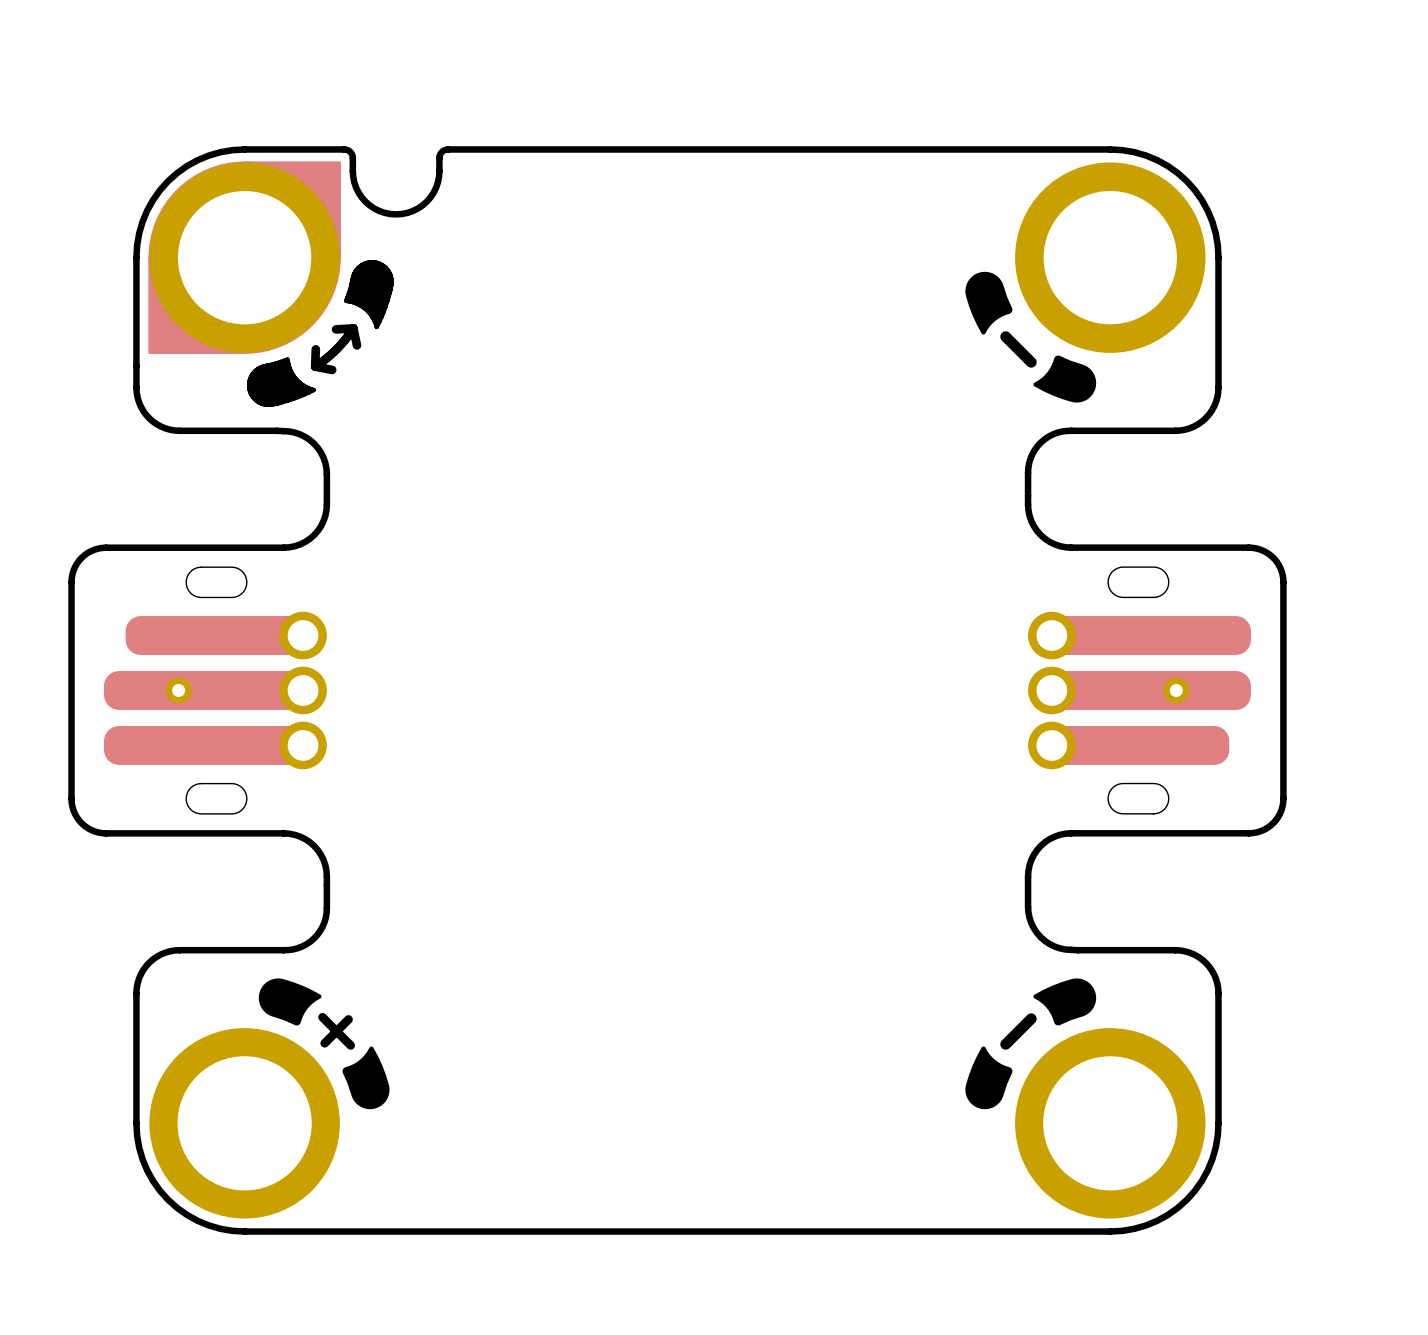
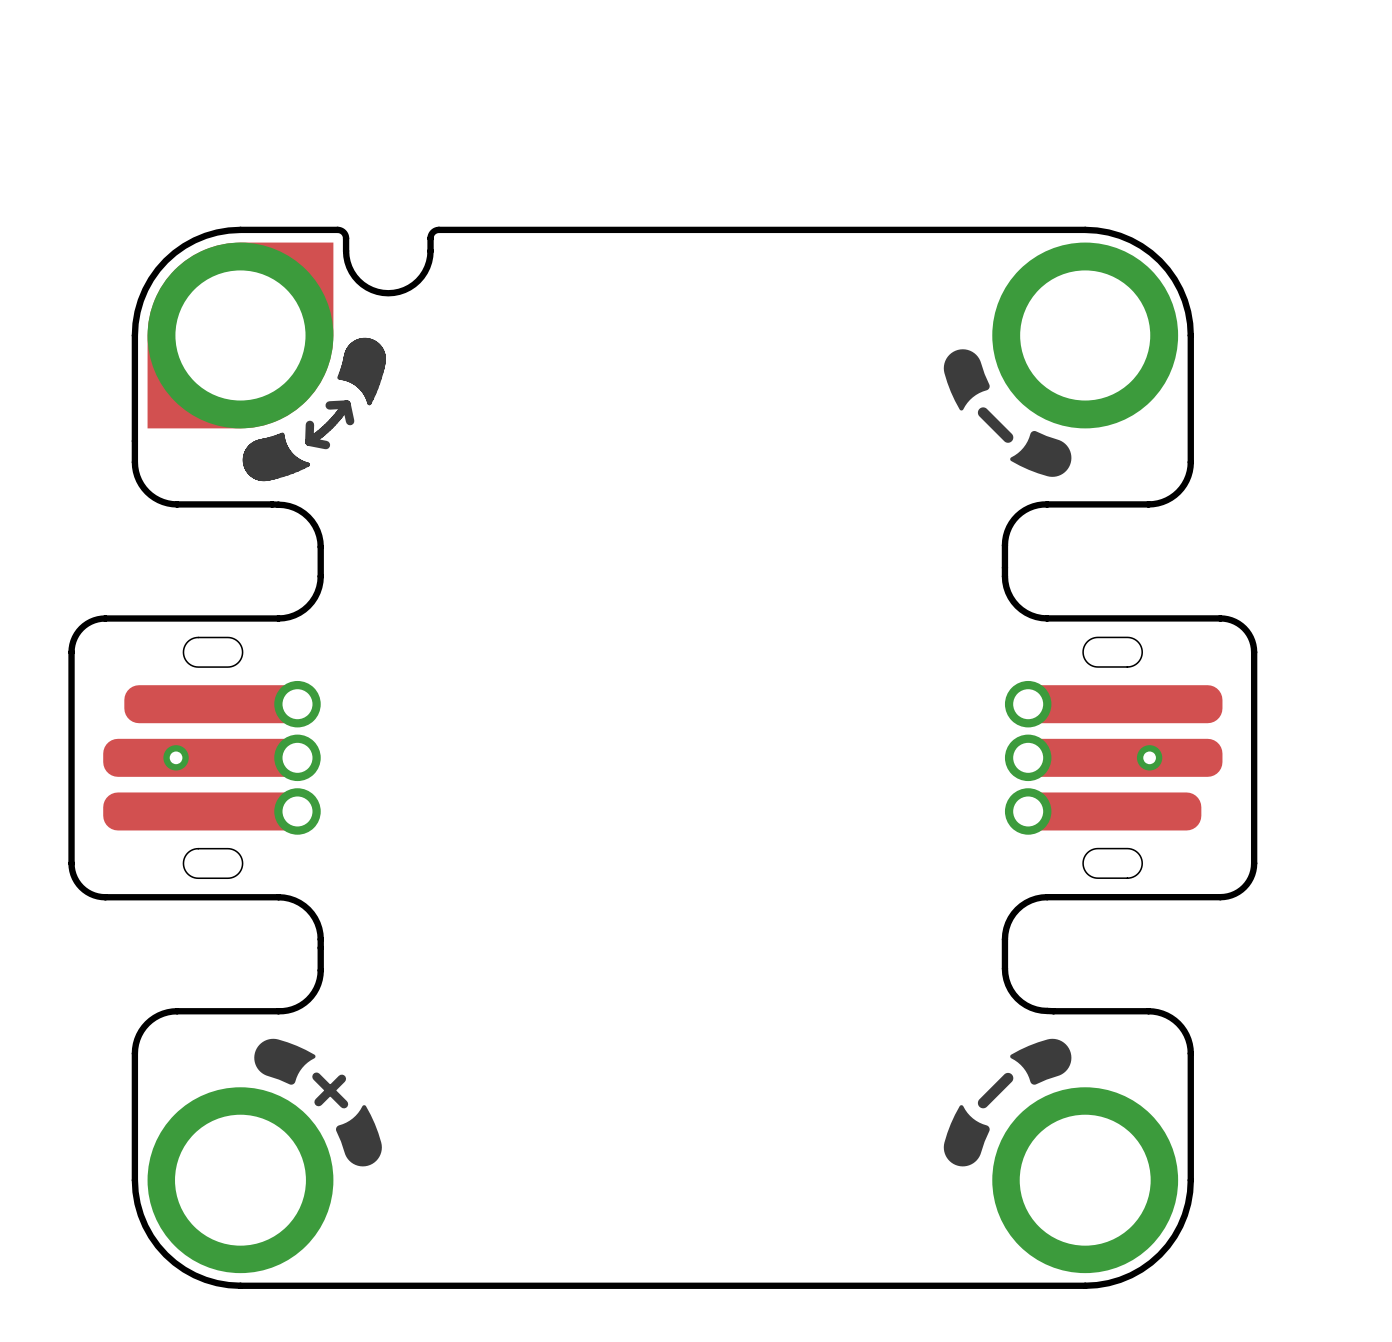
part footprint: [133, 146, 452, 407] -> [131, 226, 443, 482]

